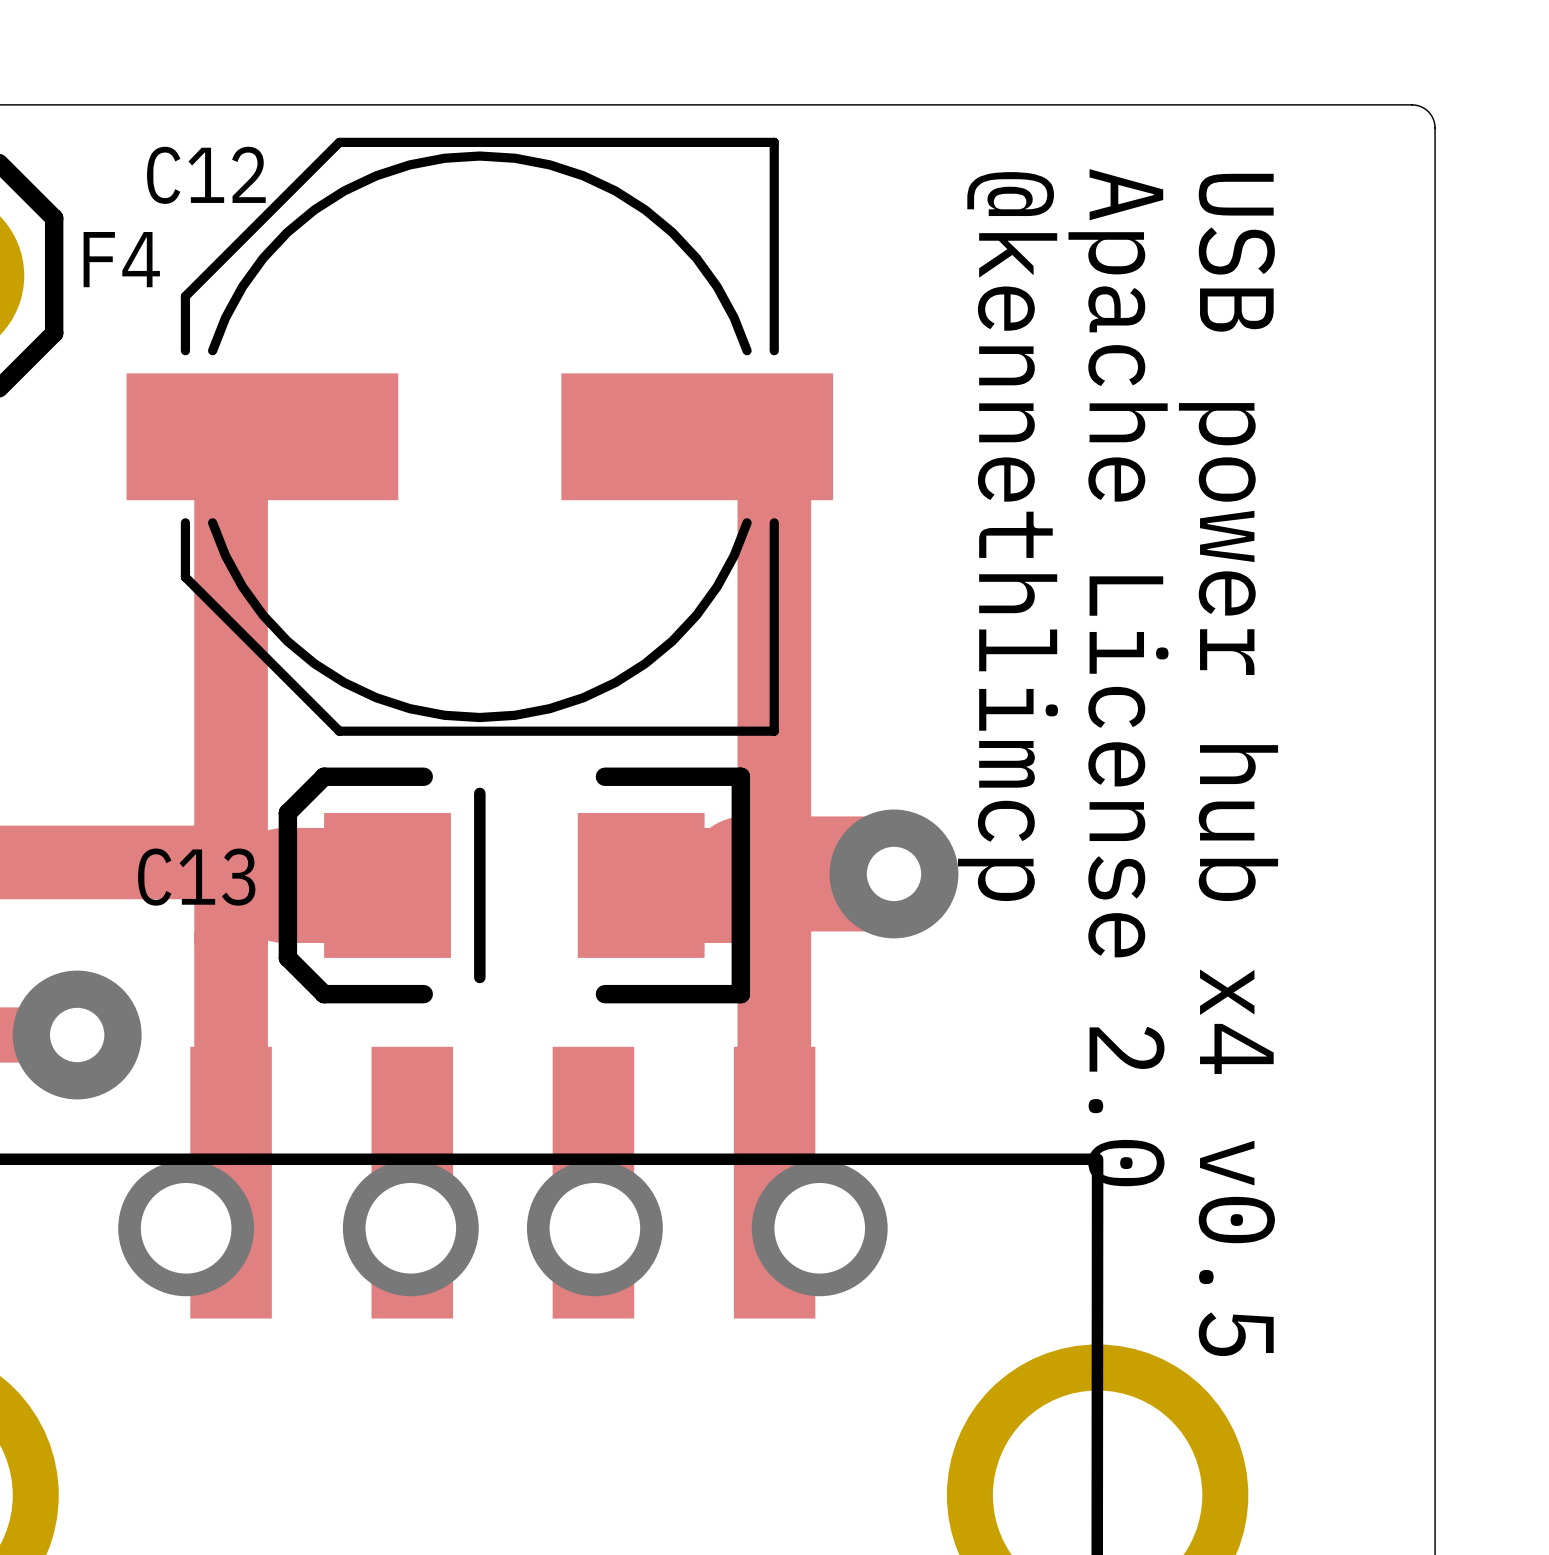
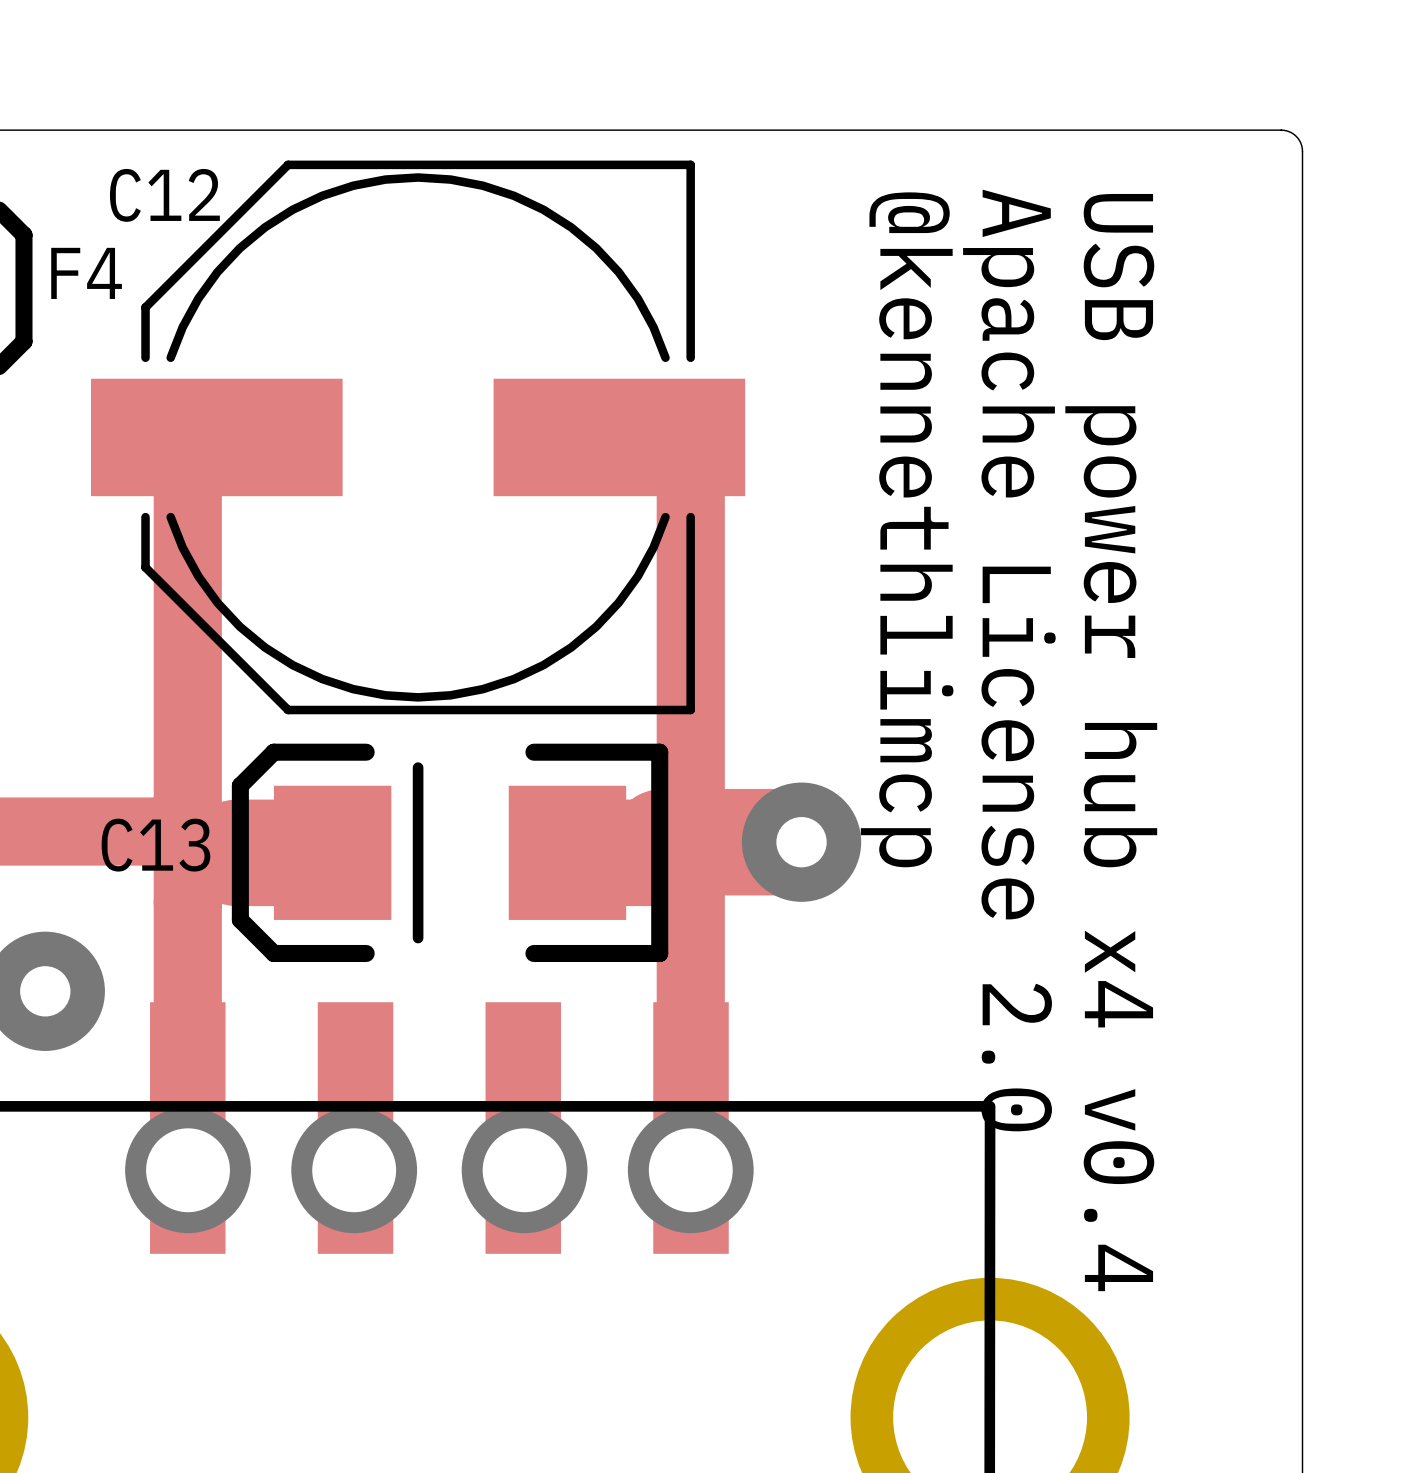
text: USB power hub x4 v0.5 (1228, 764) -> USB power hub x4 v0.4 (1111, 742)
via position: (186, 1228) -> (188, 1170)
via position: (819, 1228) -> (690, 1170)

